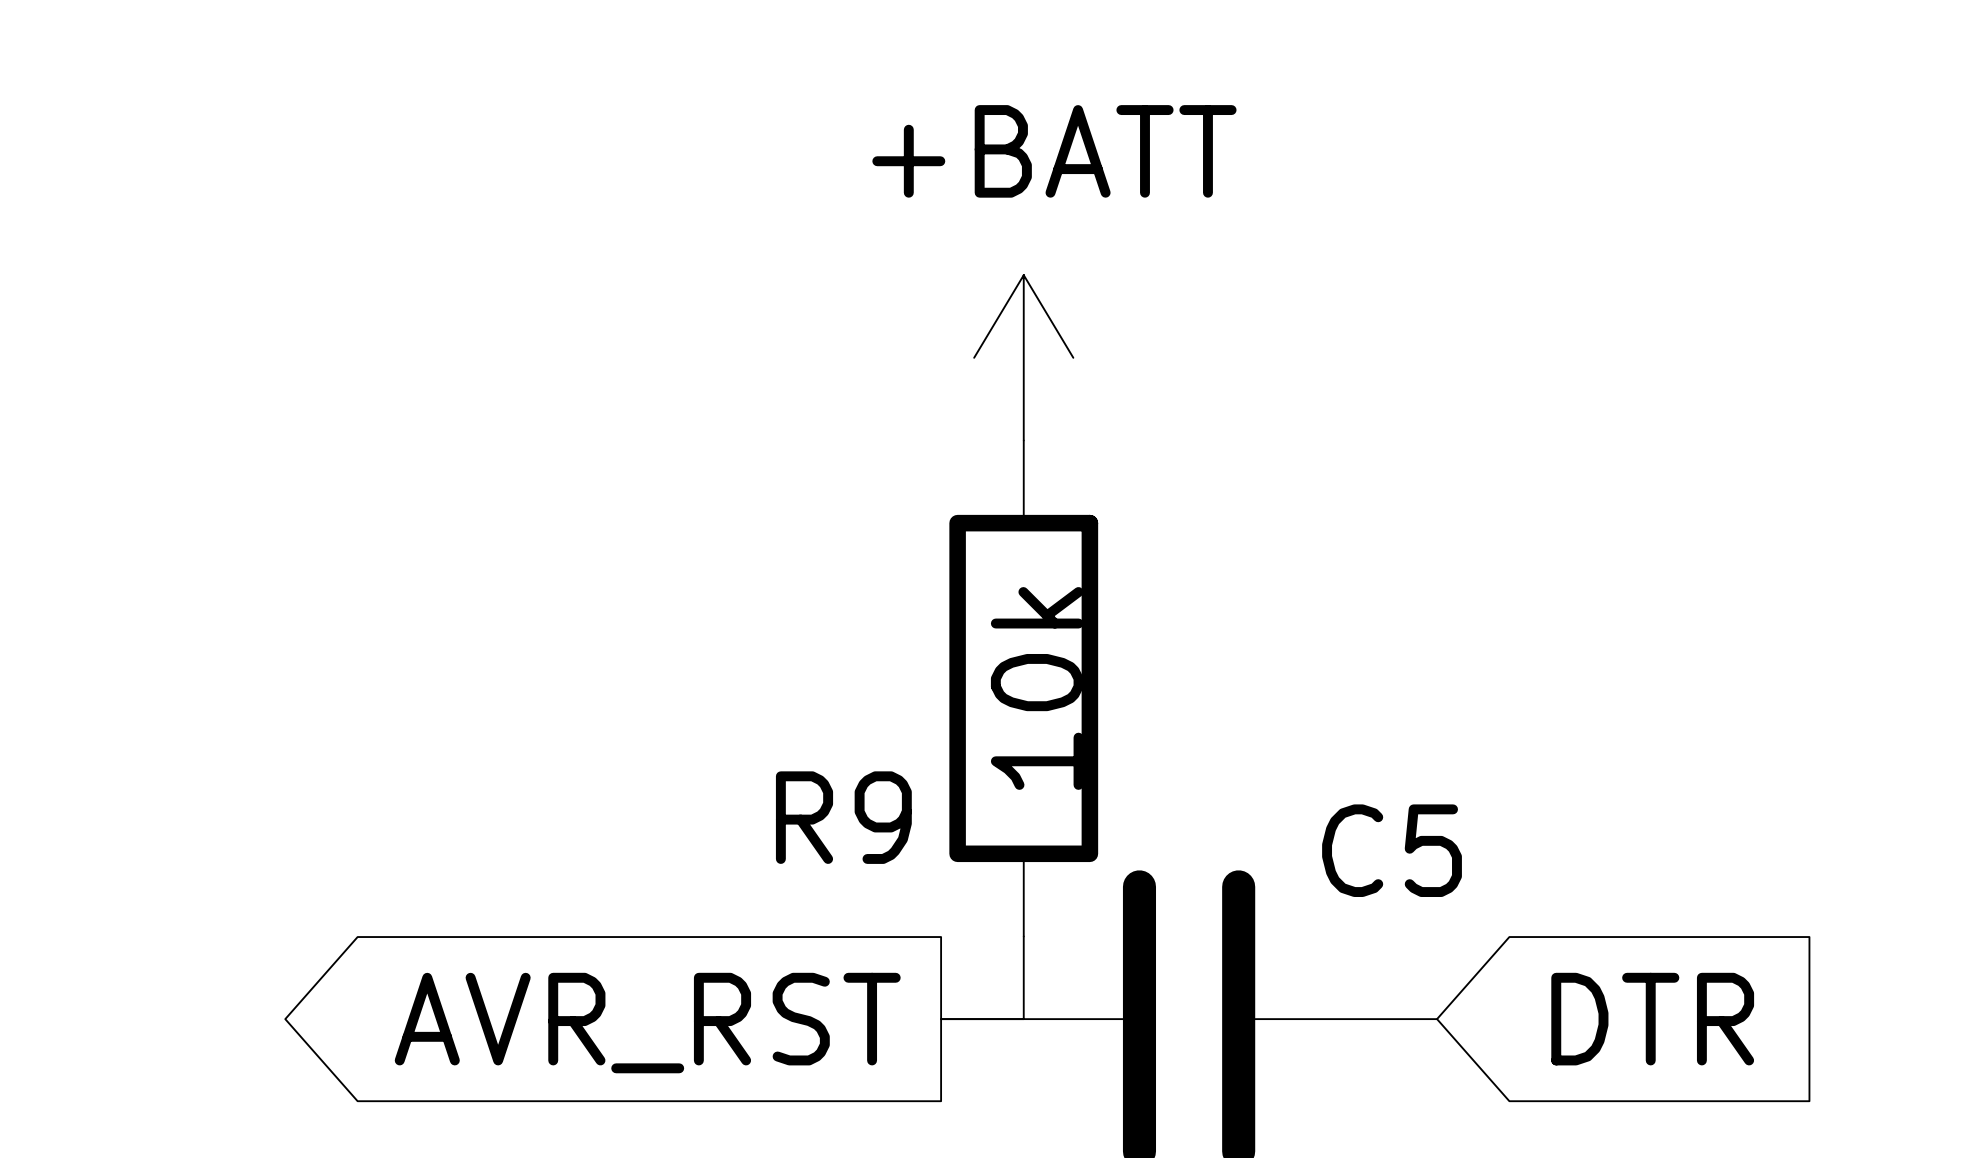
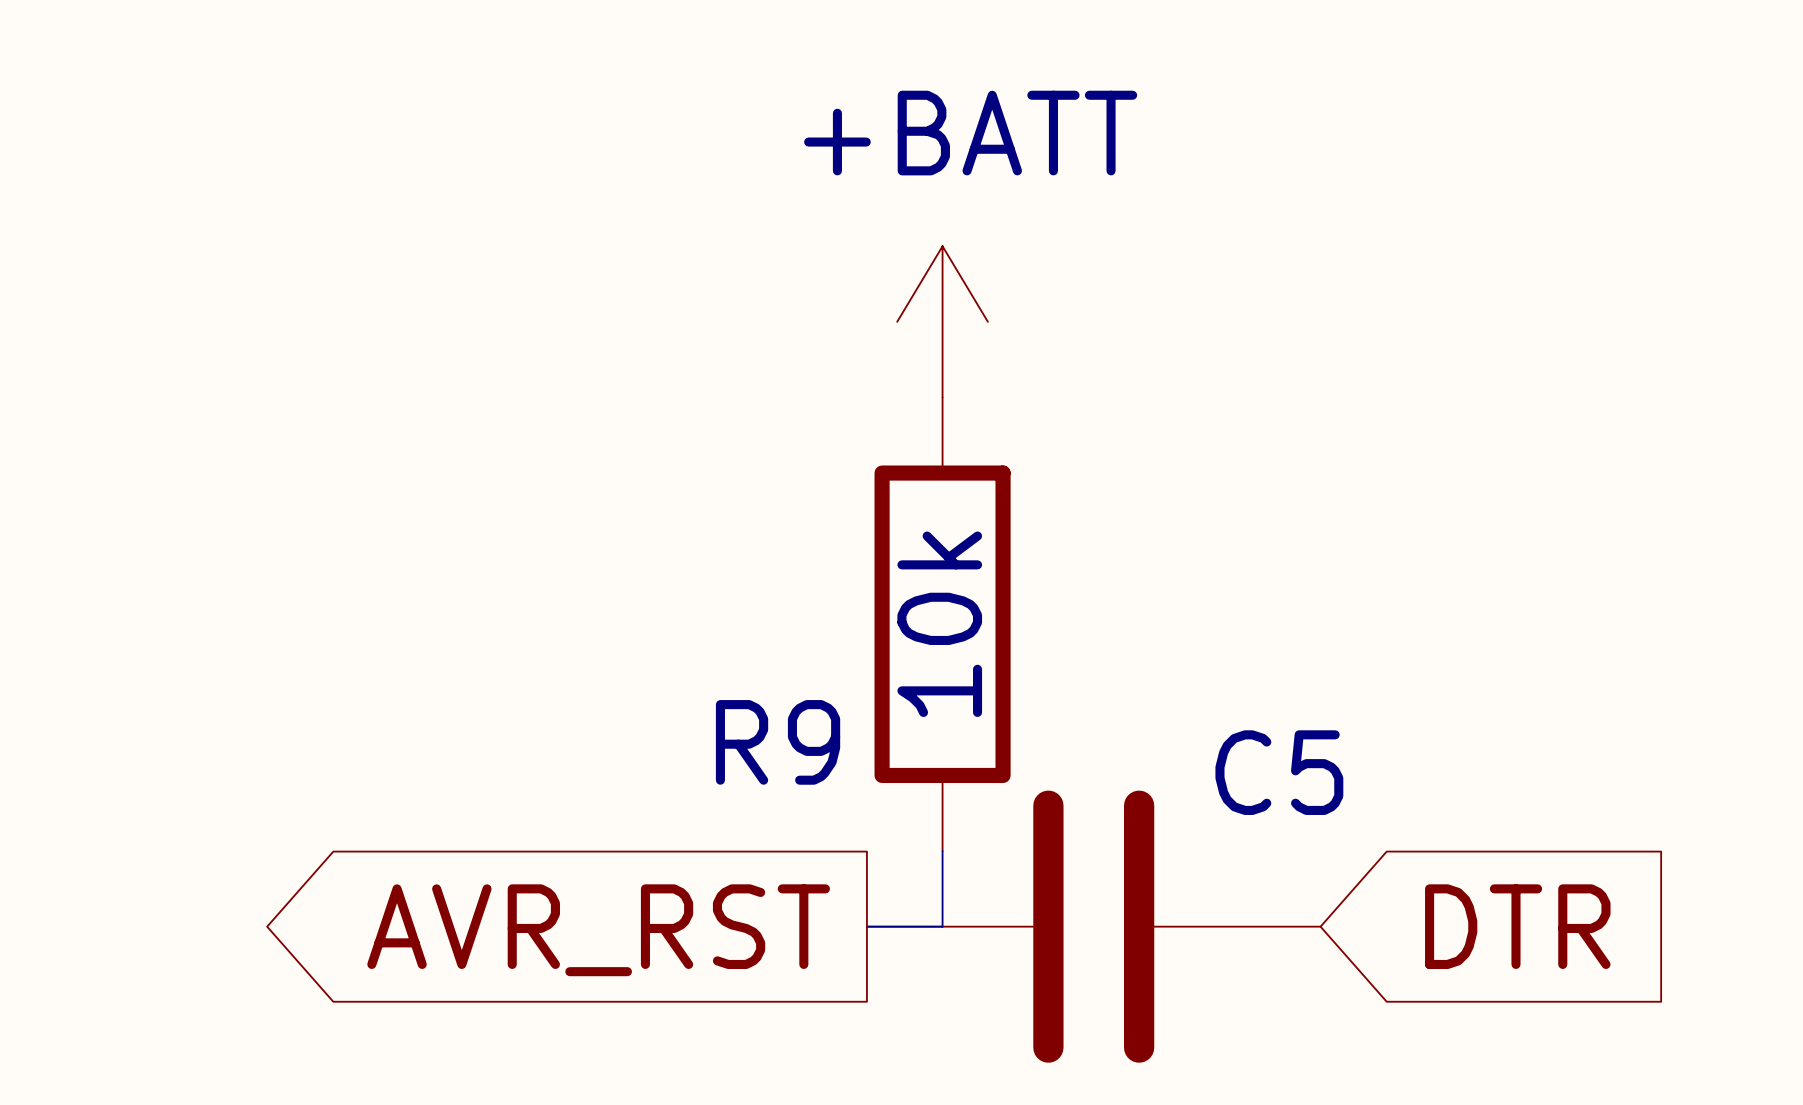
R9 value position: 10k (1037, 688) -> 10k (939, 624)

